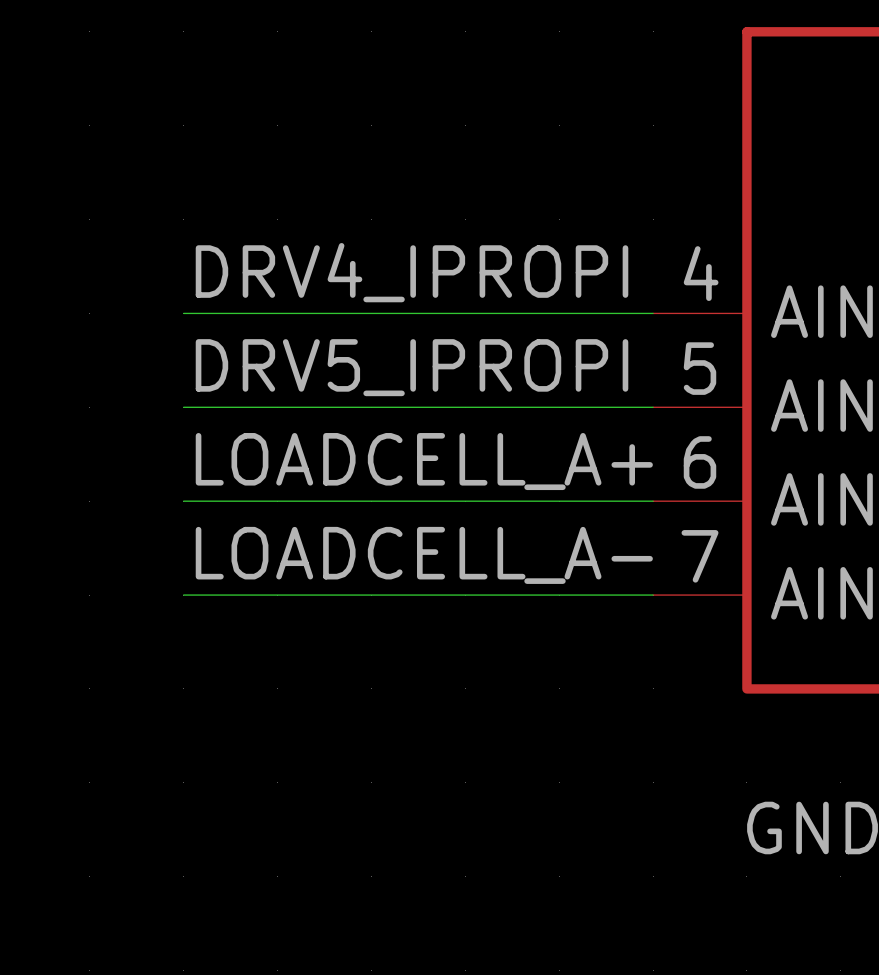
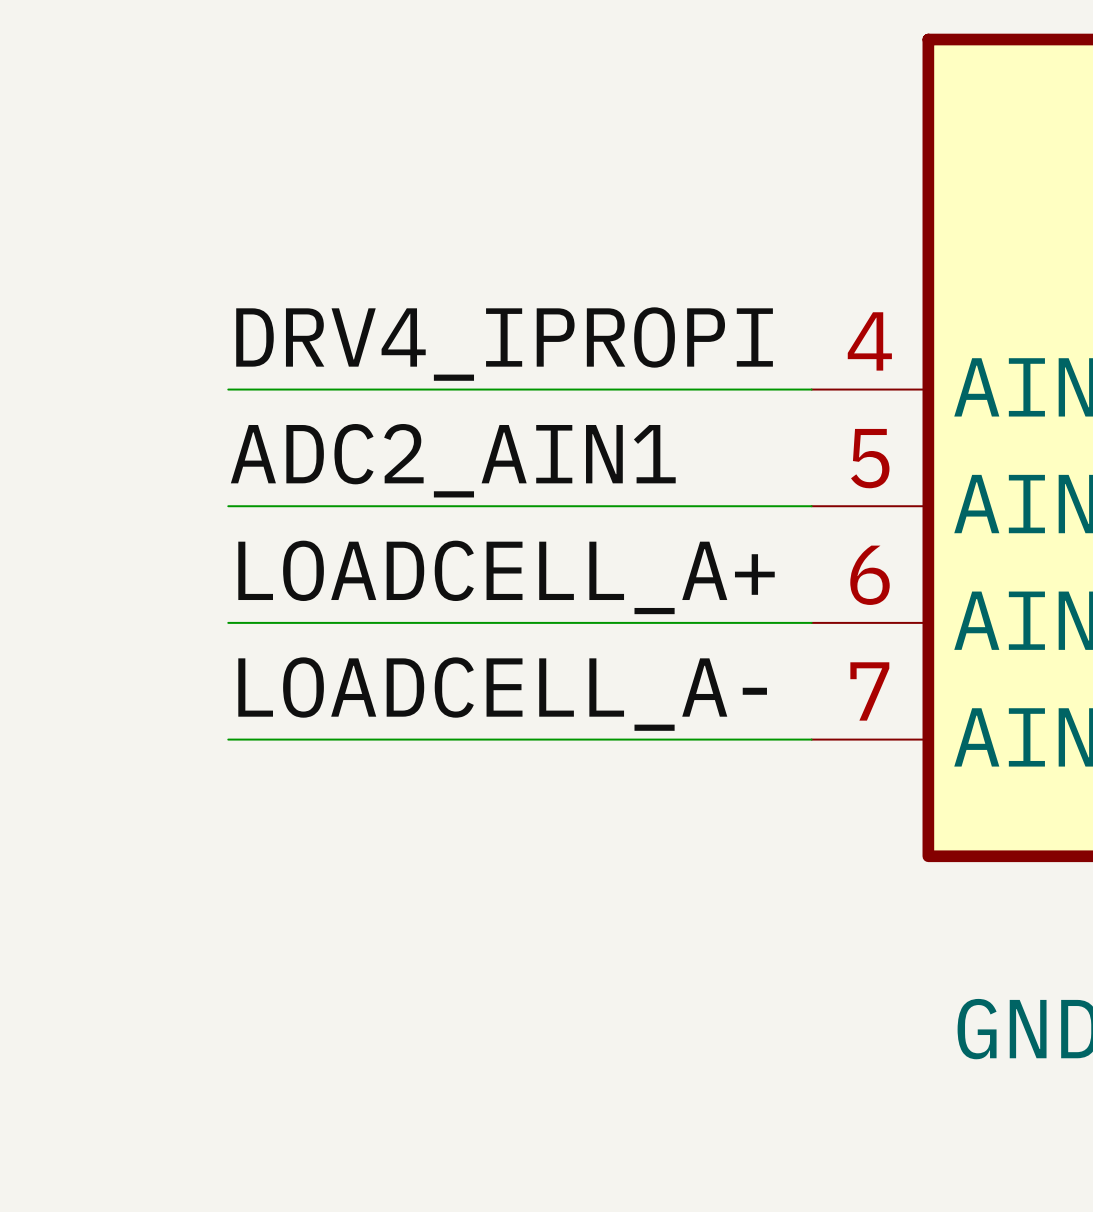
label: DRV5_IPROPI (412, 367) -> ADC2_AIN1 (453, 460)

